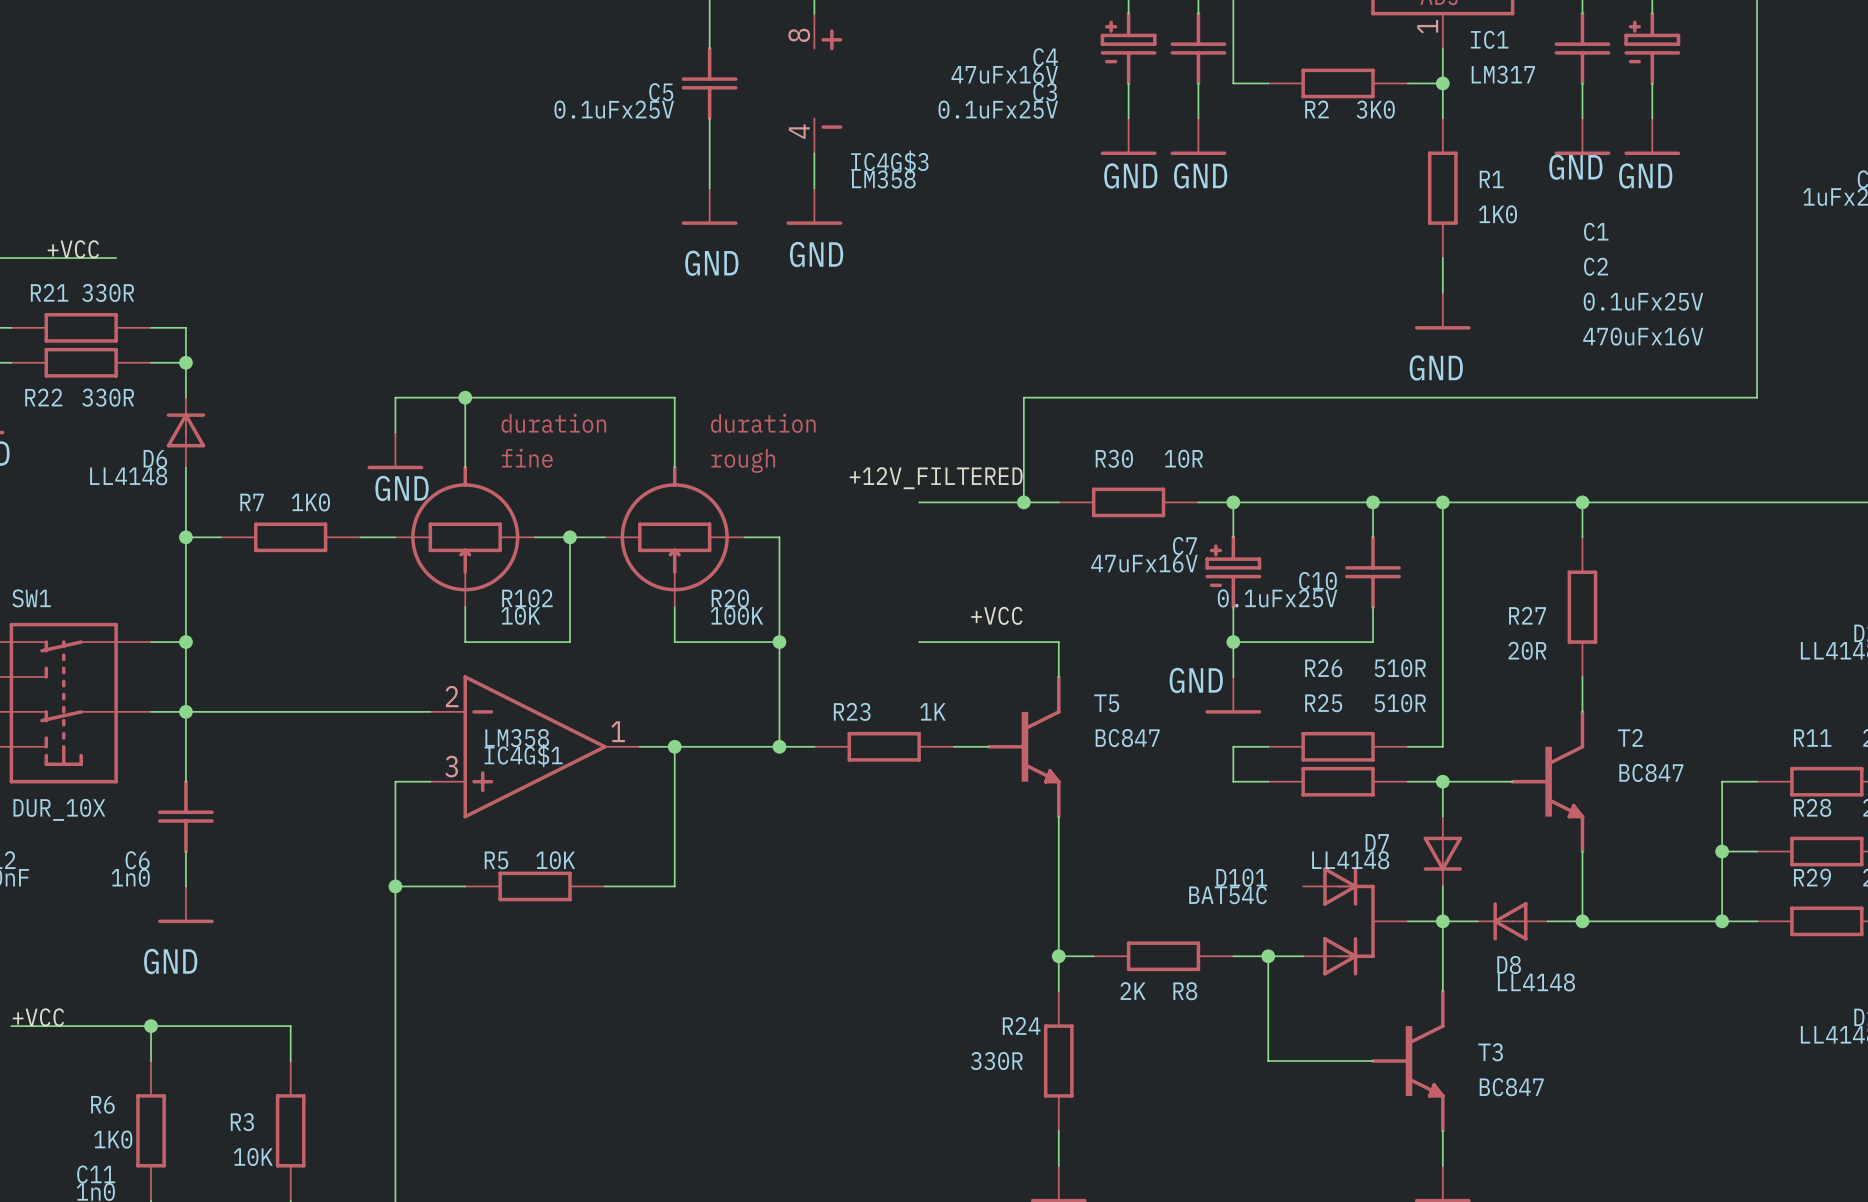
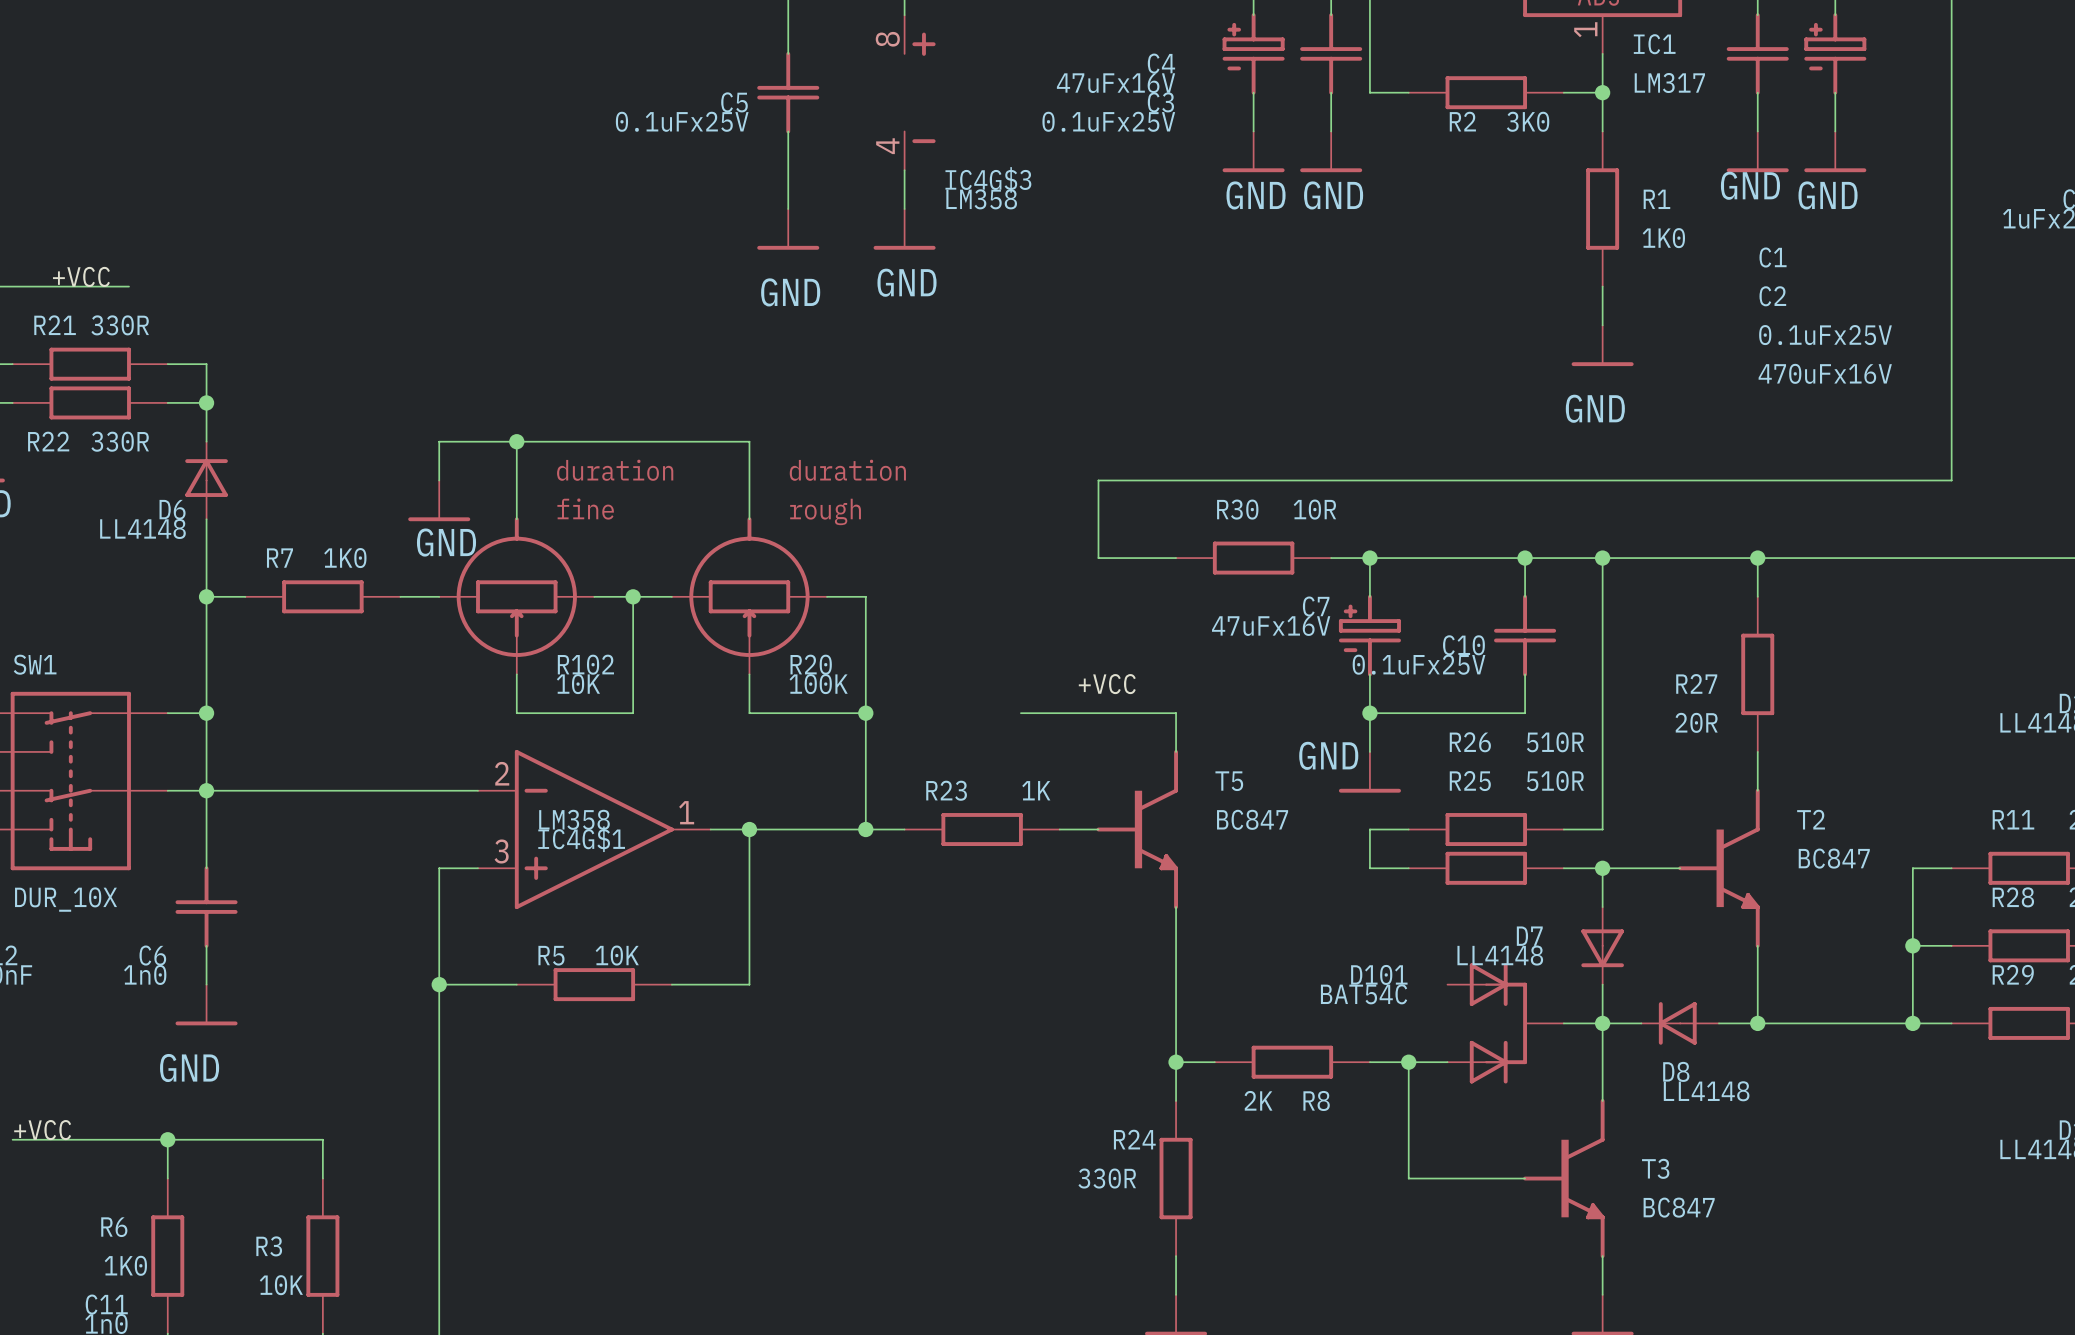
wire: (1757, 397) (1023, 397) (1023, 502) -> (1951, 441) (1951, 480) (1098, 480) (1098, 558)
label: +12V_FILTERED (936, 478) -> none
wire: (919, 502) (988, 502) -> none
junction: (1023, 502) -> none

